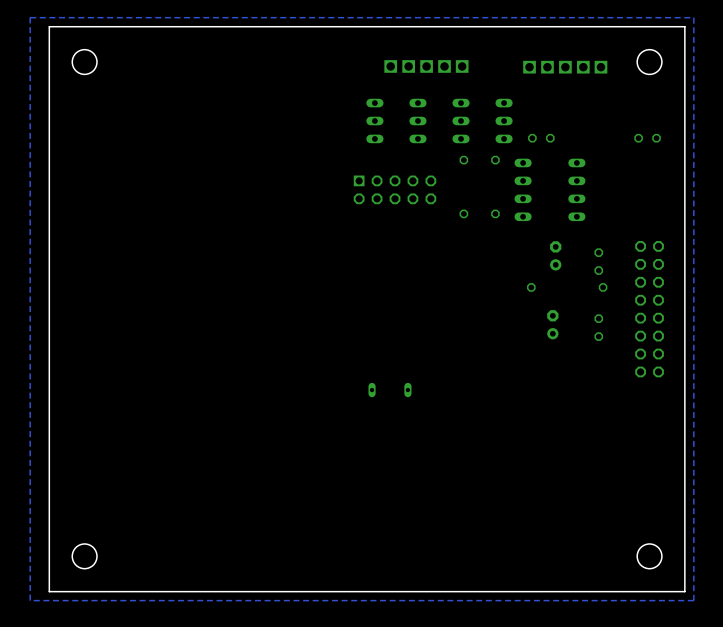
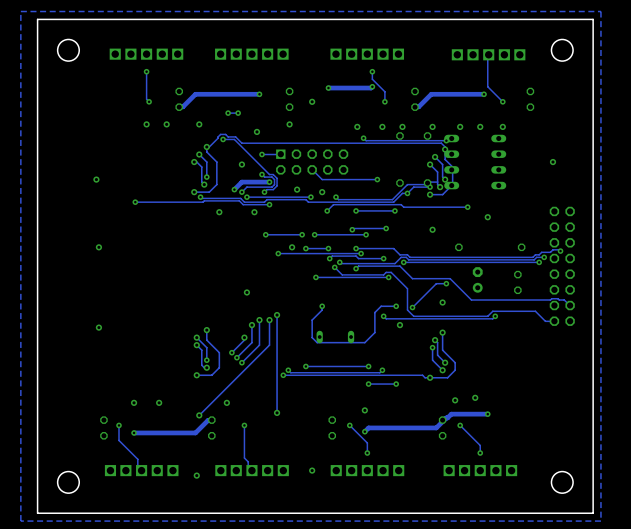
part: none -> (146, 54)
part: none -> (251, 54)
track: none -> (488, 54) (487, 86) (502, 101)
track: none -> (146, 71) (146, 99) (149, 101)
via: none -> (146, 71)
track: none -> (372, 71) (372, 79) (384, 91) (384, 101)
via: none -> (372, 71)
track: none -> (372, 86) (328, 88)
via: none -> (372, 86)
via: none -> (328, 88)
track: none -> (259, 94) (195, 94) (182, 106) (179, 107)
via: none -> (259, 94)
track: none -> (484, 94) (431, 94) (418, 106) (415, 107)
via: none -> (484, 94)
part: none -> (179, 99)
part: none -> (289, 99)
part: none -> (415, 99)
part: none -> (530, 99)
via: none -> (149, 101)
via: none -> (312, 101)
part: (374, 120) -> none
part: (417, 120) -> none
via: none -> (384, 101)
part: (461, 120) -> none
part: (504, 120) -> none
via: none -> (502, 101)
via: none -> (228, 113)
track: none -> (238, 113) (228, 113)
via: none -> (238, 113)
part: (541, 138) -> none
part: (647, 138) -> none
via: none -> (146, 124)
via: none -> (166, 124)
via: none -> (199, 124)
via: none -> (289, 124)
via: none -> (357, 126)
via: none -> (382, 126)
via: none -> (402, 126)
via: none -> (432, 126)
via: none -> (460, 126)
via: none -> (480, 126)
via: none -> (502, 126)
via: none -> (256, 131)
track: none -> (363, 138) (366, 140) (446, 140)
via: none -> (363, 138)
track: none -> (223, 139) (234, 139) (269, 174) (273, 174) (277, 178) (277, 185) (273, 189) (267, 189) (264, 192)
via: none -> (223, 139)
via: none -> (446, 140)
via: none -> (206, 146)
via: none -> (445, 149)
track: none -> (280, 154) (261, 154)
track: none -> (199, 154) (206, 162) (206, 177)
via: none -> (199, 154)
via: none -> (261, 154)
track: none -> (435, 157) (442, 164) (442, 177) (445, 179)
via: none -> (435, 157)
track: none -> (194, 162) (201, 167) (201, 182) (204, 184)
via: none -> (194, 162)
part position: (395, 189) -> (312, 162)
via: none -> (552, 162)
via: none -> (241, 164)
track: none -> (430, 164) (437, 172) (437, 184) (440, 187)
via: none -> (430, 164)
track: none -> (312, 169) (322, 179) (377, 179)
track: none -> (261, 174) (264, 177) (272, 177) (274, 179) (274, 184) (272, 187) (246, 187) (241, 192)
via: none -> (261, 174)
via: none -> (206, 177)
via: none -> (96, 179)
via: none -> (377, 179)
via: none -> (445, 179)
track: none -> (269, 182) (241, 182) (234, 189)
via: none -> (269, 182)
track: none -> (437, 182) (407, 184) (392, 199) (338, 199) (335, 197)
via: none -> (204, 184)
track: none -> (430, 187) (413, 187) (407, 193) (402, 193) (393, 202) (308, 202) (305, 199) (267, 199) (264, 202) (244, 202) (240, 198) (200, 197)
via: none -> (430, 187)
via: none -> (440, 187)
via: none -> (234, 189)
via: none -> (297, 189)
track: none -> (194, 192) (209, 192) (216, 184) (216, 162) (206, 151) (206, 146) (209, 146) (220, 134) (225, 134) (228, 136) (235, 136) (241, 143) (441, 143) (445, 146) (445, 159) (452, 167) (452, 184) (442, 194) (430, 194)
via: none -> (194, 192)
via: none -> (241, 192)
via: none -> (264, 192)
via: none -> (322, 192)
via: none -> (407, 193)
via: none -> (430, 194)
via: none -> (200, 197)
via: none -> (246, 197)
track: none -> (310, 197) (246, 197)
via: none -> (310, 197)
via: none -> (335, 197)
track: none -> (135, 202) (239, 200) (243, 204) (269, 204)
via: none -> (135, 202)
via: none -> (269, 204)
track: none -> (467, 207) (333, 204) (327, 210)
via: none -> (467, 207)
via: none -> (327, 210)
via: none -> (356, 210)
track: none -> (394, 210) (356, 210)
via: none -> (394, 210)
via: none -> (219, 212)
via: none -> (254, 212)
via: none -> (487, 217)
part: (555, 255) -> none
part: (598, 261) -> none
track: none -> (386, 228) (351, 228) (352, 229)
via: none -> (386, 228)
via: none -> (352, 229)
via: none -> (432, 229)
via: none -> (265, 234)
track: none -> (302, 234) (265, 234)
via: none -> (302, 234)
via: none -> (314, 234)
track: none -> (366, 234) (314, 234)
via: none -> (366, 234)
via: none -> (98, 247)
via: none -> (292, 247)
via: none -> (305, 248)
track: none -> (328, 248) (305, 248)
via: none -> (328, 248)
track: none -> (356, 248) (393, 248) (399, 254) (407, 254) (410, 257) (532, 257) (541, 252) (550, 252) (552, 249) (560, 251)
via: none -> (356, 248)
via: none -> (560, 251)
via: none -> (278, 253)
track: none -> (361, 253) (278, 253)
via: none -> (361, 253)
track: none -> (544, 257) (536, 257) (534, 259) (408, 259) (406, 257) (401, 257) (394, 263) (339, 262)
via: none -> (544, 257)
via: none -> (329, 258)
track: none -> (383, 258) (358, 258) (356, 256) (332, 256) (329, 258)
via: none -> (383, 258)
via: none -> (339, 262)
via: none -> (403, 262)
track: none -> (539, 262) (403, 262)
via: none -> (539, 262)
track: none -> (334, 267) (342, 274) (383, 274) (386, 272) (391, 272) (407, 288) (407, 310) (413, 316) (487, 316) (492, 311) (535, 311) (545, 321) (554, 321)
via: none -> (334, 267)
track: none -> (356, 268) (358, 266) (399, 266) (412, 278) (450, 278) (471, 300) (558, 298) (564, 300) (570, 305)
via: none -> (356, 268)
via: none -> (315, 277)
track: none -> (388, 277) (315, 277)
via: none -> (388, 277)
track: none -> (446, 283) (436, 283) (412, 307)
via: none -> (446, 283)
via: none -> (246, 292)
via: none -> (442, 302)
via: none -> (322, 306)
track: none -> (396, 306) (381, 306) (374, 312) (374, 332) (364, 342) (317, 342) (312, 337) (312, 320) (322, 310) (322, 306)
via: none -> (396, 306)
via: none -> (412, 307)
track: none -> (277, 315) (277, 412)
via: none -> (277, 315)
via: none -> (383, 316)
track: none -> (495, 316) (492, 318) (386, 318) (383, 316)
via: none -> (495, 316)
track: none -> (259, 320) (259, 345) (241, 362)
via: none -> (259, 320)
track: none -> (269, 320) (269, 345) (199, 415)
via: none -> (269, 320)
track: none -> (251, 325) (251, 342) (236, 357)
via: none -> (251, 325)
via: none -> (399, 325)
via: none -> (98, 327)
track: none -> (206, 330) (206, 340) (219, 352) (219, 367) (211, 375) (196, 375)
via: none -> (206, 330)
track: none -> (442, 332) (442, 350) (455, 362) (455, 370) (447, 377) (425, 377) (422, 375) (283, 375)
via: none -> (442, 332)
track: none -> (196, 337) (206, 347) (206, 360)
via: none -> (196, 337)
track: none -> (244, 337) (244, 340) (231, 352)
via: none -> (244, 337)
track: none -> (435, 340) (437, 342) (437, 355) (445, 362)
via: none -> (435, 340)
track: none -> (196, 345) (201, 350) (201, 365) (206, 367)
via: none -> (196, 345)
track: none -> (432, 347) (432, 360) (442, 370)
via: none -> (432, 347)
via: none -> (231, 352)
via: none -> (236, 357)
via: none -> (206, 360)
via: none -> (241, 362)
via: none -> (445, 362)
via: none -> (305, 366)
track: none -> (368, 366) (305, 366)
via: none -> (368, 366)
via: none -> (206, 367)
via: none -> (288, 370)
track: none -> (382, 370) (379, 372) (290, 372) (288, 370)
via: none -> (382, 370)
via: none -> (442, 370)
via: none -> (196, 375)
via: none -> (283, 375)
via: none -> (430, 377)
via: none -> (368, 384)
track: none -> (396, 384) (368, 384)
via: none -> (396, 384)
via: none -> (475, 397)
via: none -> (455, 400)
via: none -> (134, 402)
via: none -> (159, 402)
via: none -> (226, 402)
via: none -> (364, 410)
via: none -> (277, 412)
track: none -> (487, 414) (451, 414) (442, 419) (443, 420) (436, 427) (368, 427) (364, 431)
via: none -> (487, 414)
via: none -> (199, 415)
track: none -> (211, 420) (208, 420) (195, 432) (134, 432)
track: none -> (119, 425) (119, 440) (137, 459) (137, 470) (141, 470)
via: none -> (119, 425)
track: none -> (244, 425) (244, 458) (248, 461) (248, 470) (251, 470)
via: none -> (244, 425)
track: none -> (349, 425) (367, 442) (367, 453)
via: none -> (349, 425)
track: none -> (460, 425) (480, 445) (480, 453)
via: none -> (460, 425)
part: none -> (103, 427)
part: none -> (211, 427)
part: none -> (332, 427)
part: none -> (442, 427)
via: none -> (364, 431)
via: none -> (134, 432)
via: none -> (367, 453)
via: none -> (480, 453)
part: none -> (141, 470)
part: none -> (252, 470)
via: none -> (312, 470)
part: none -> (367, 470)
part: none -> (480, 470)
via: none -> (196, 475)

